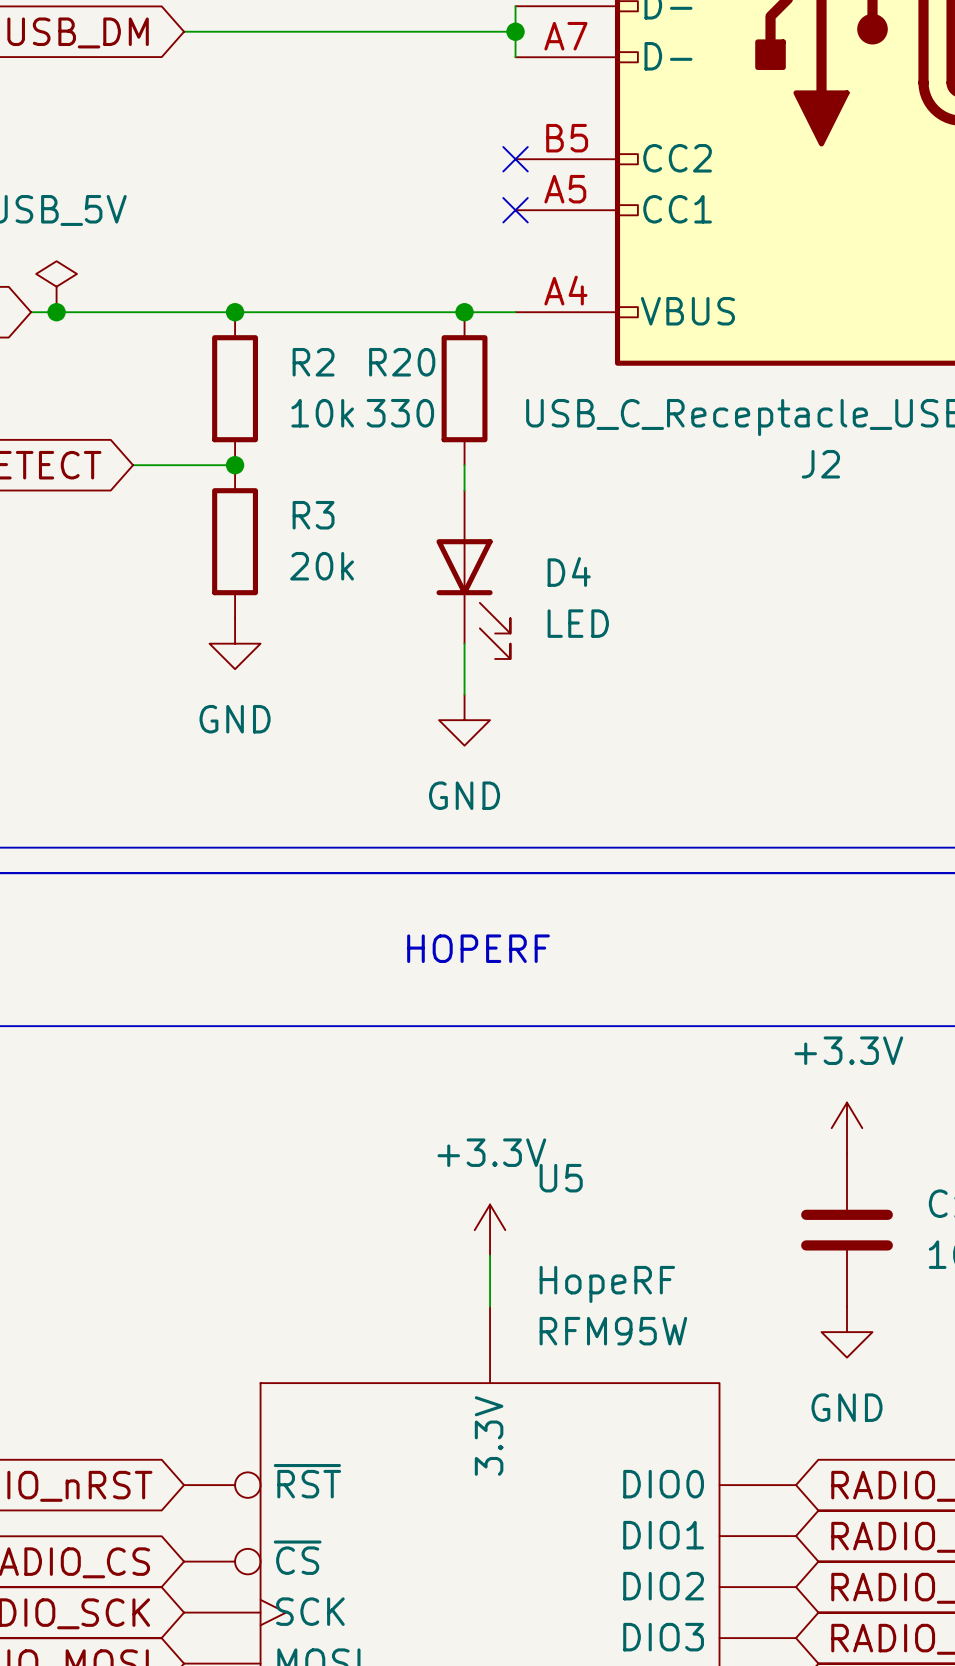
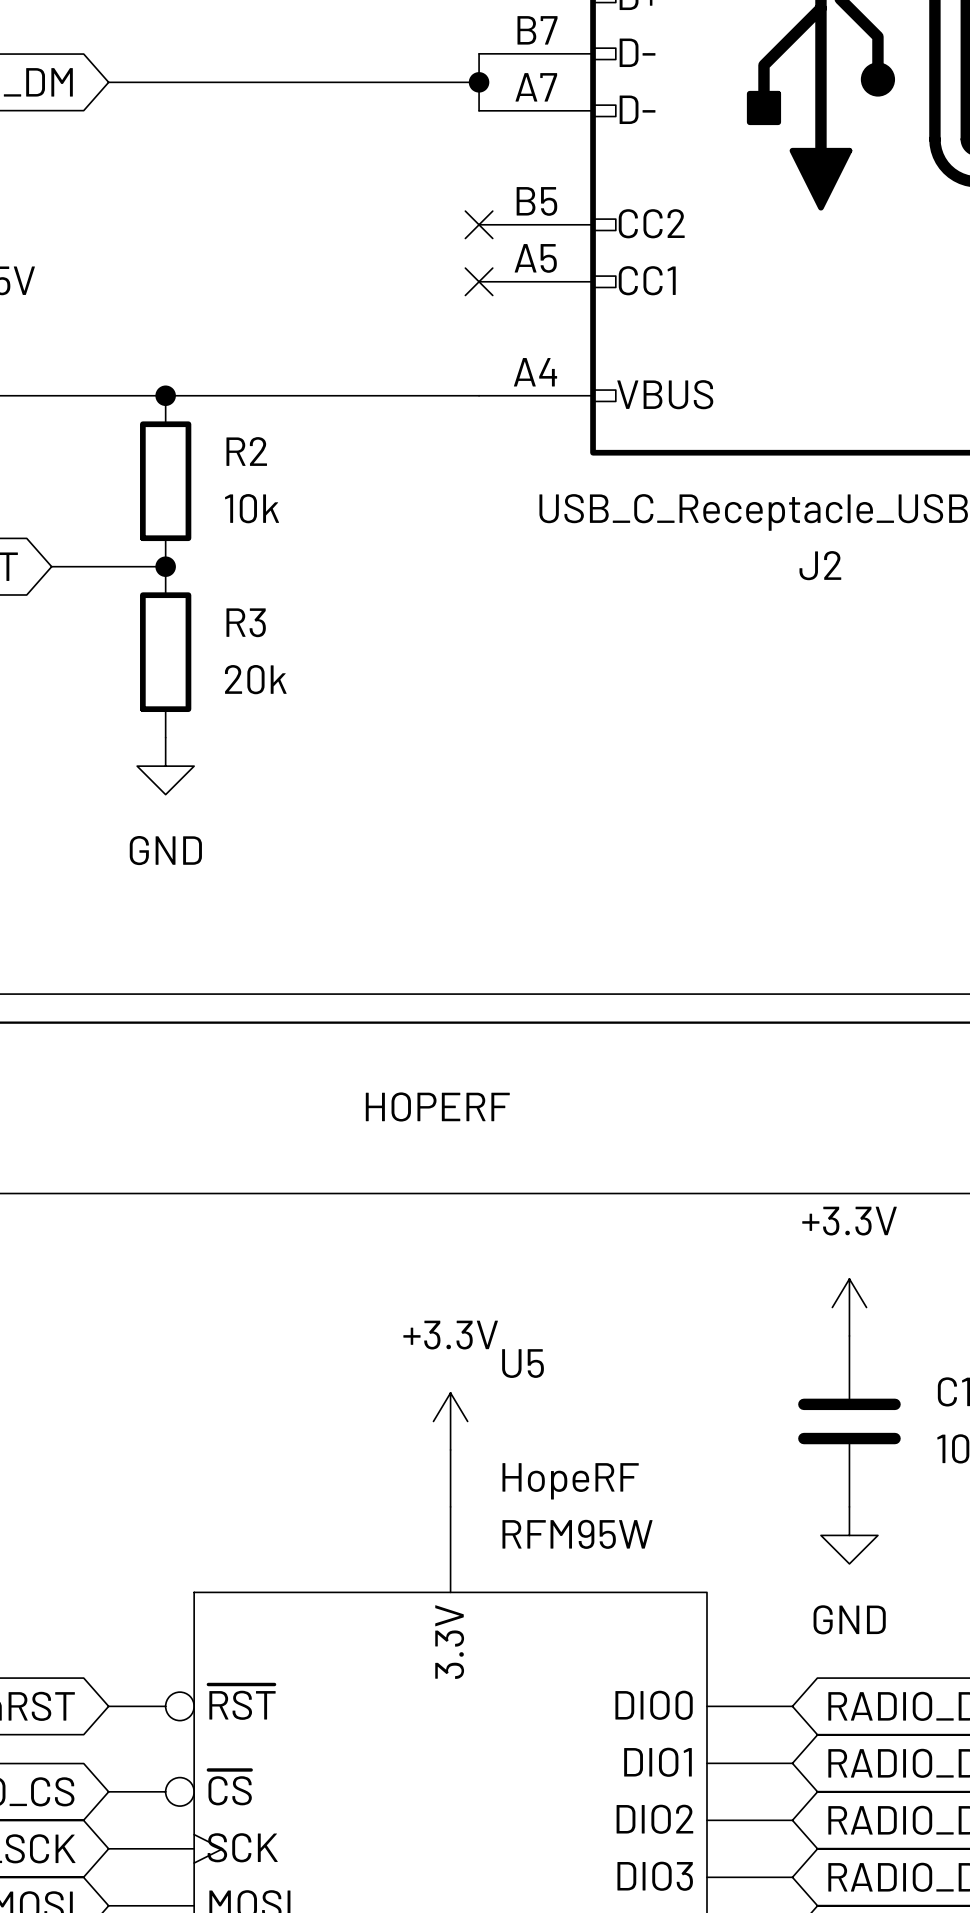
junction: (464, 312) -> none
R20: 330 (464, 388) -> none
wire: (464, 465) (464, 490) -> none
D4: LED (473, 574) -> none
wire: (464, 643) (464, 694) -> none
power symbol: GND (464, 720) -> none

